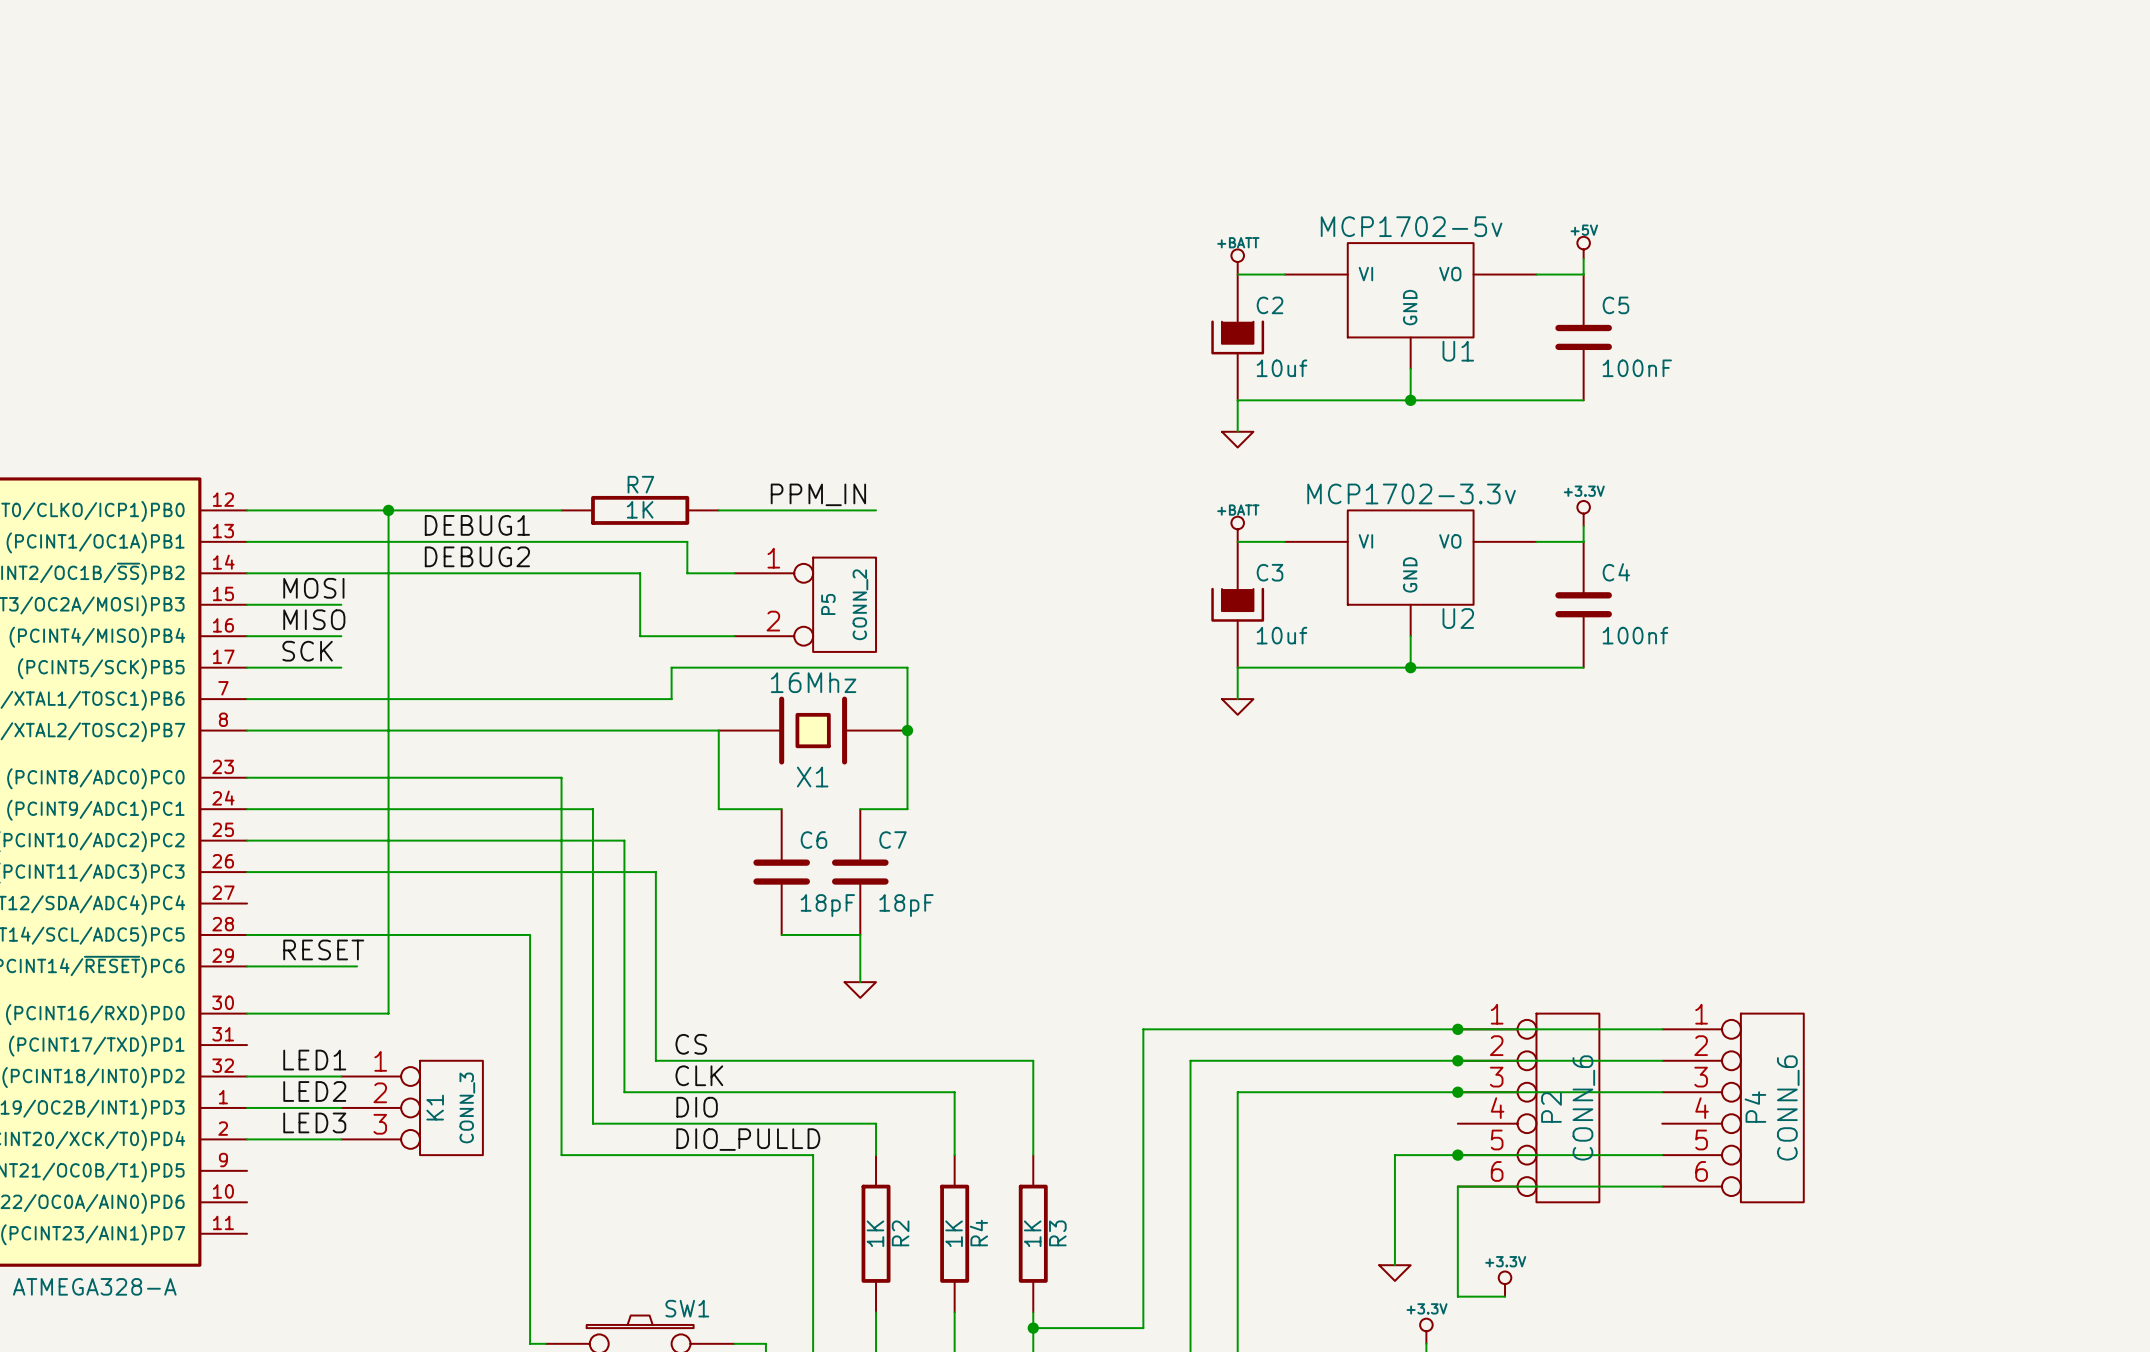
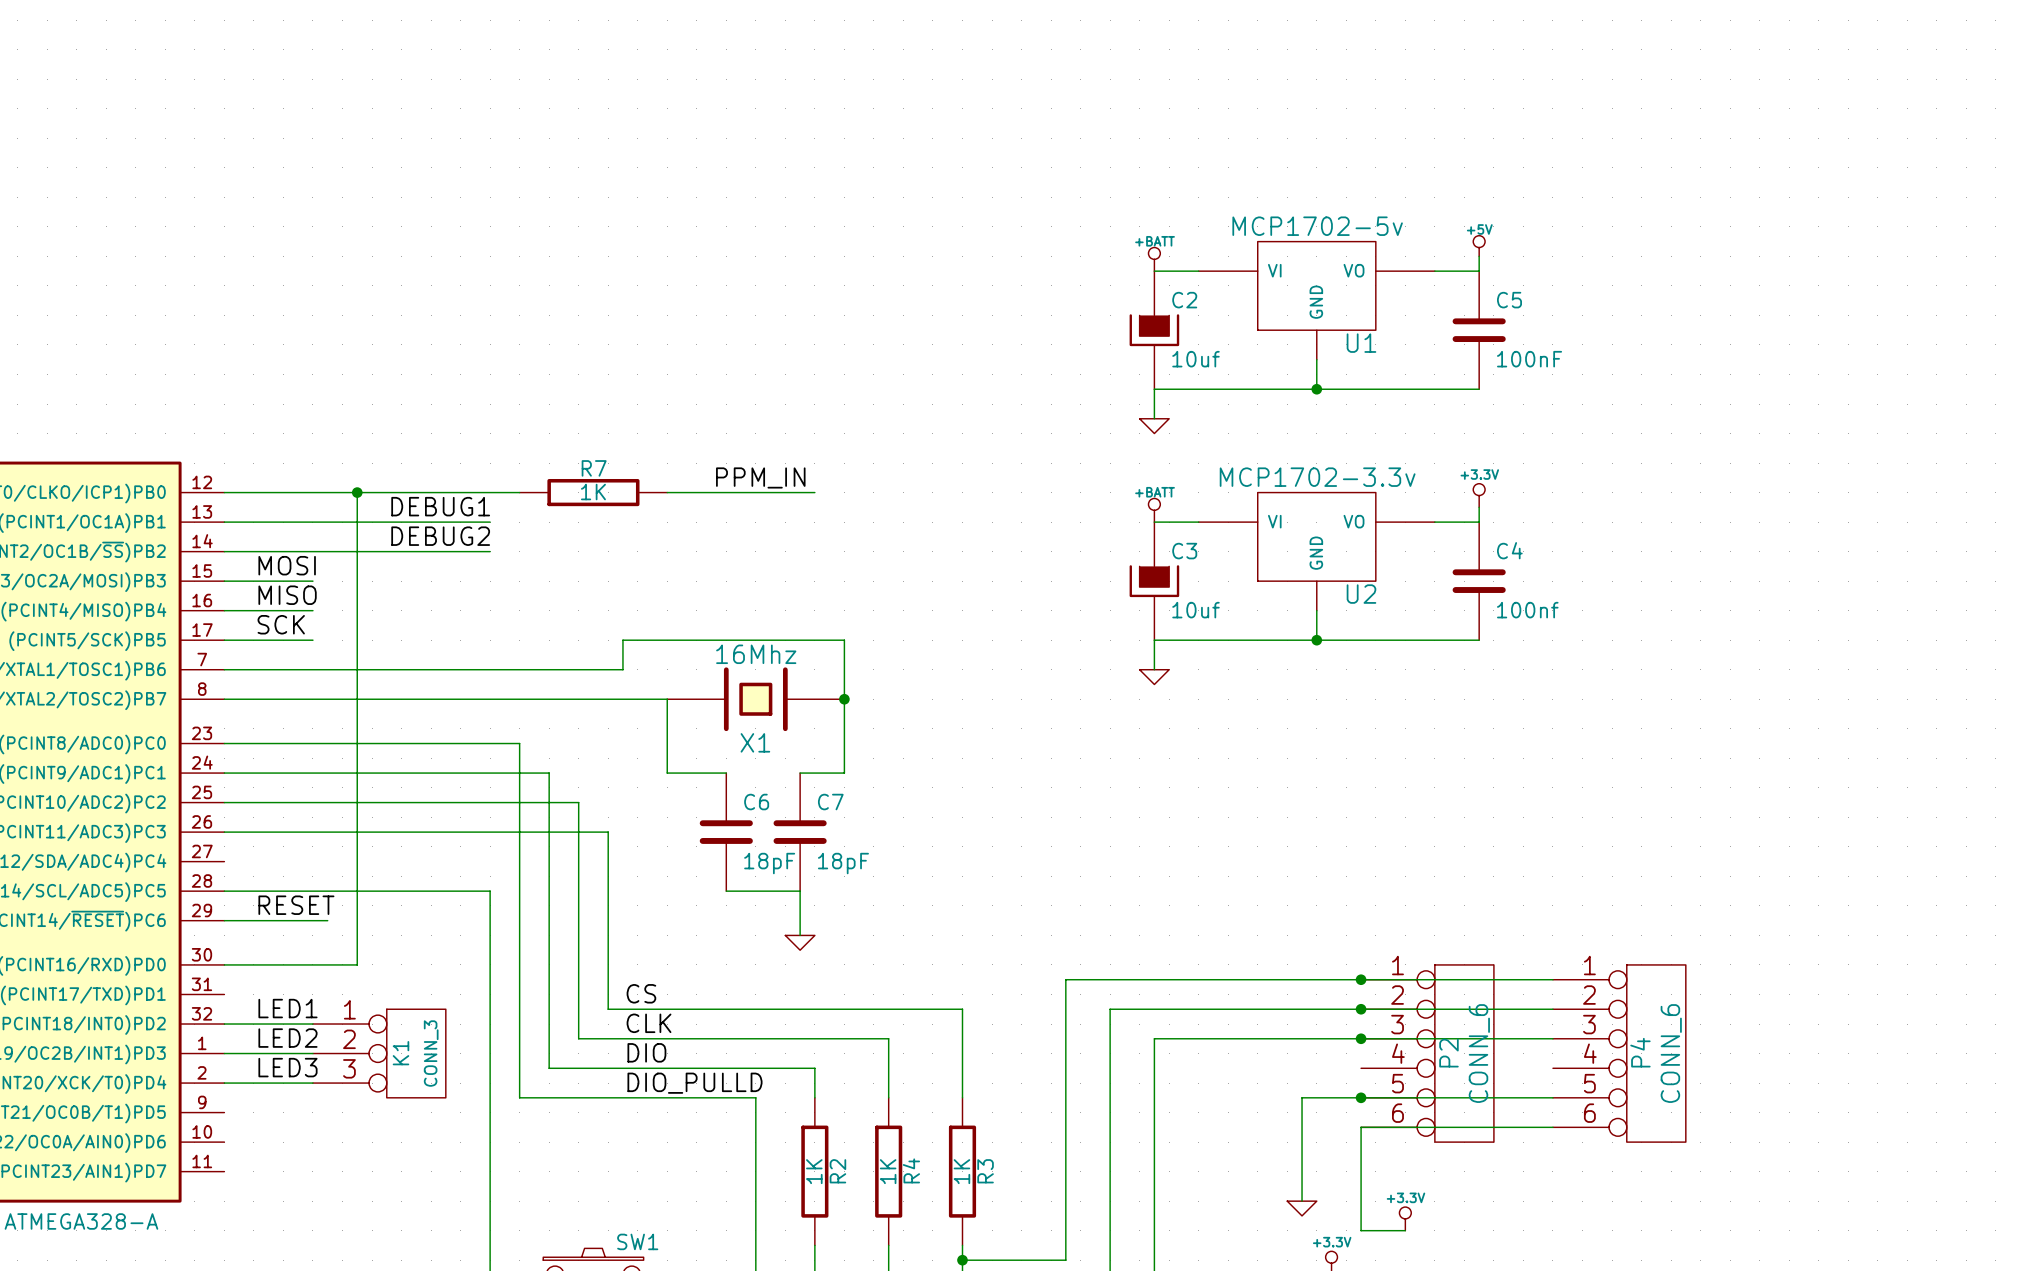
wire: (530, 541) (687, 541) (687, 573) (734, 573) -> none
wire: (530, 573) (640, 573) (640, 636) (734, 636) -> none
P5: CONN_2 (805, 604) -> none

